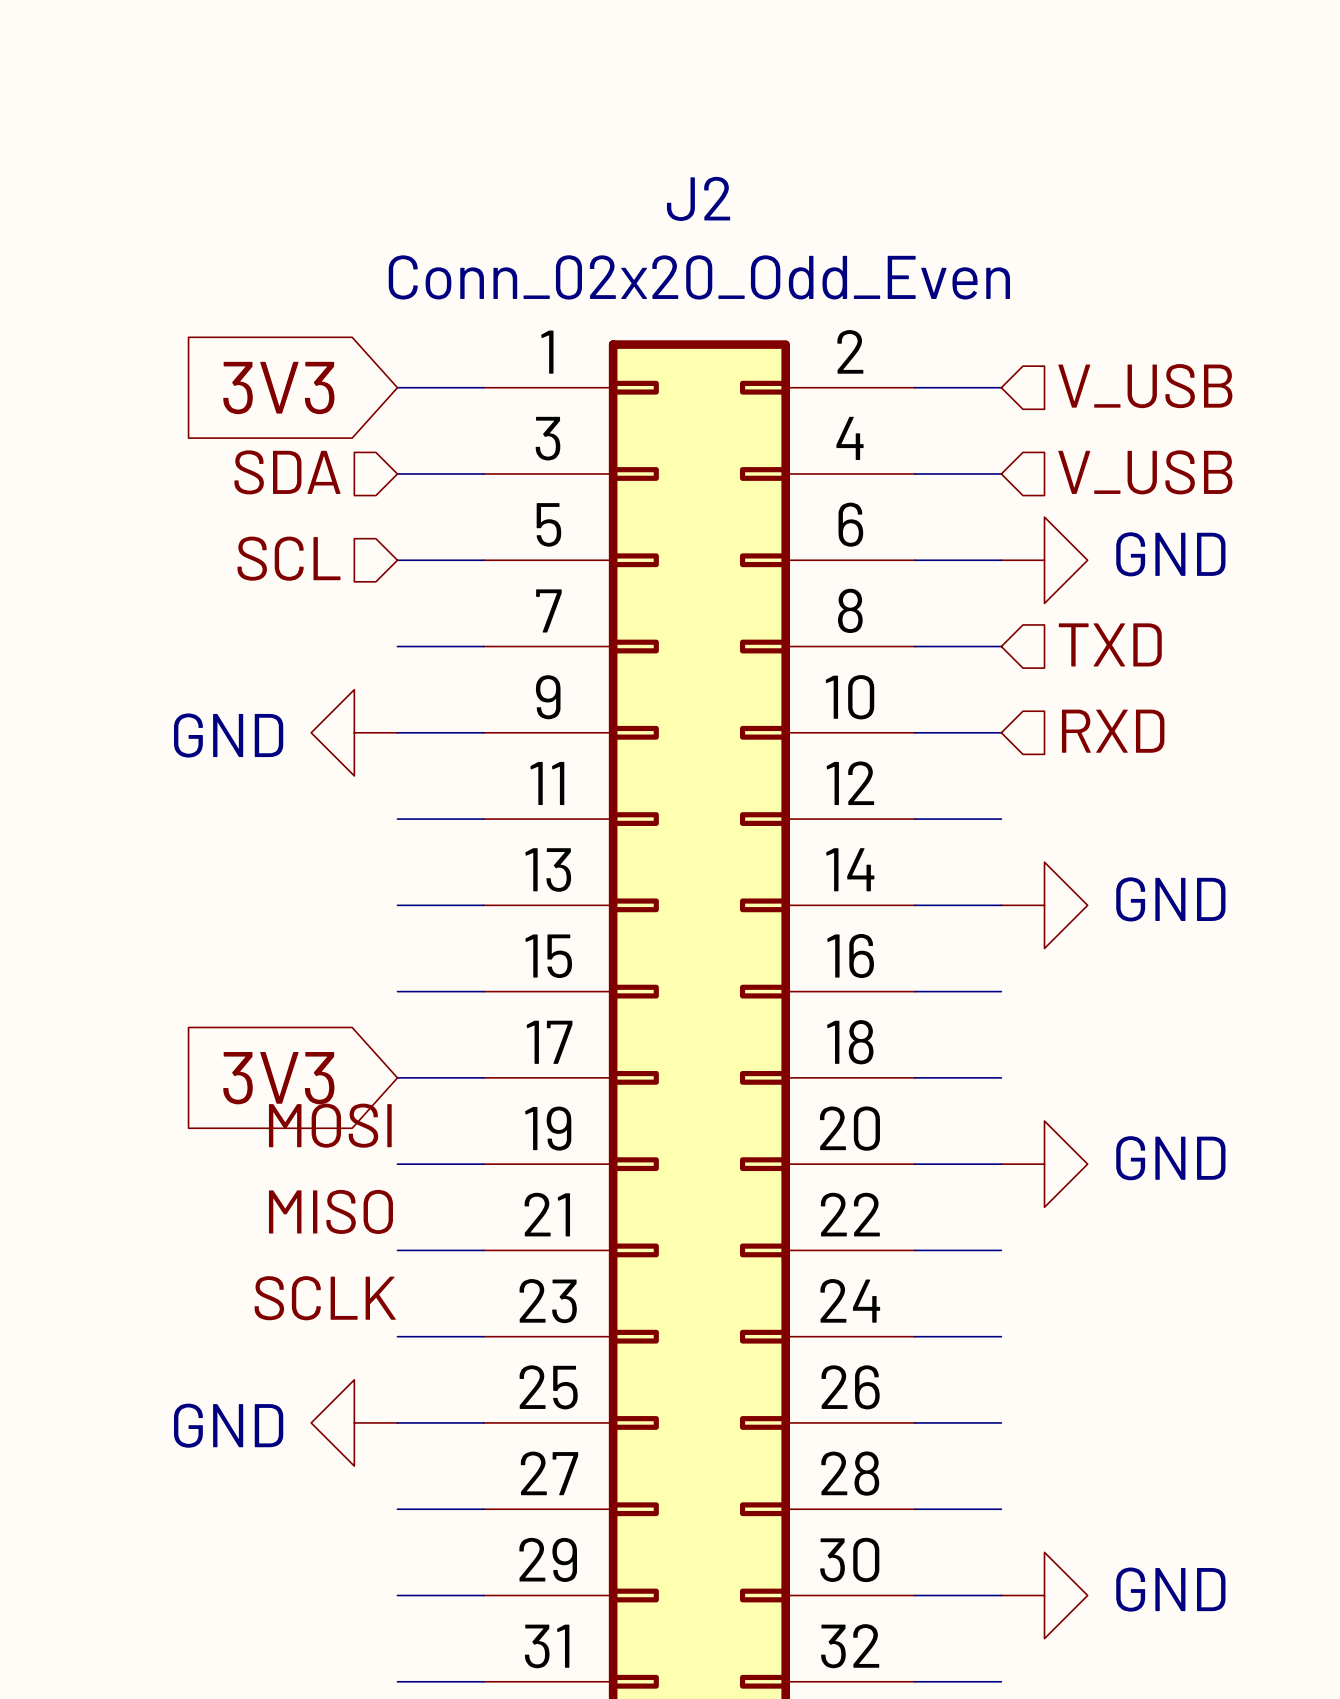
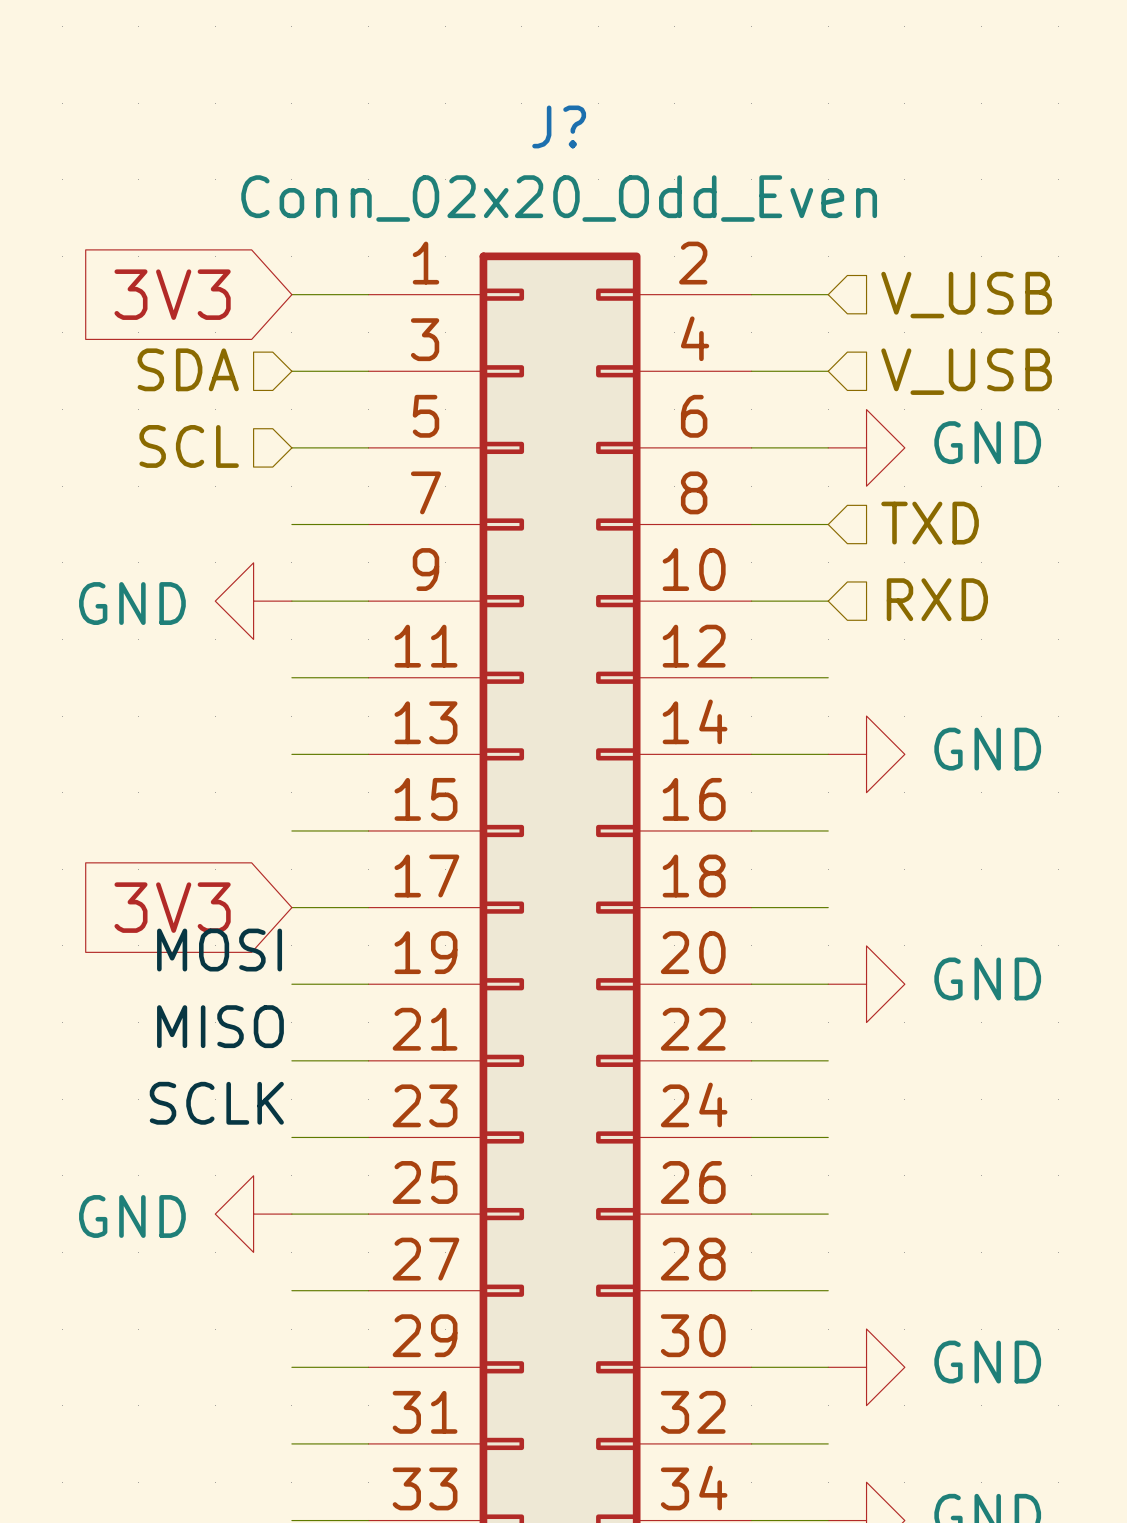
J2 name: J2 (698, 198) -> J? (559, 126)

